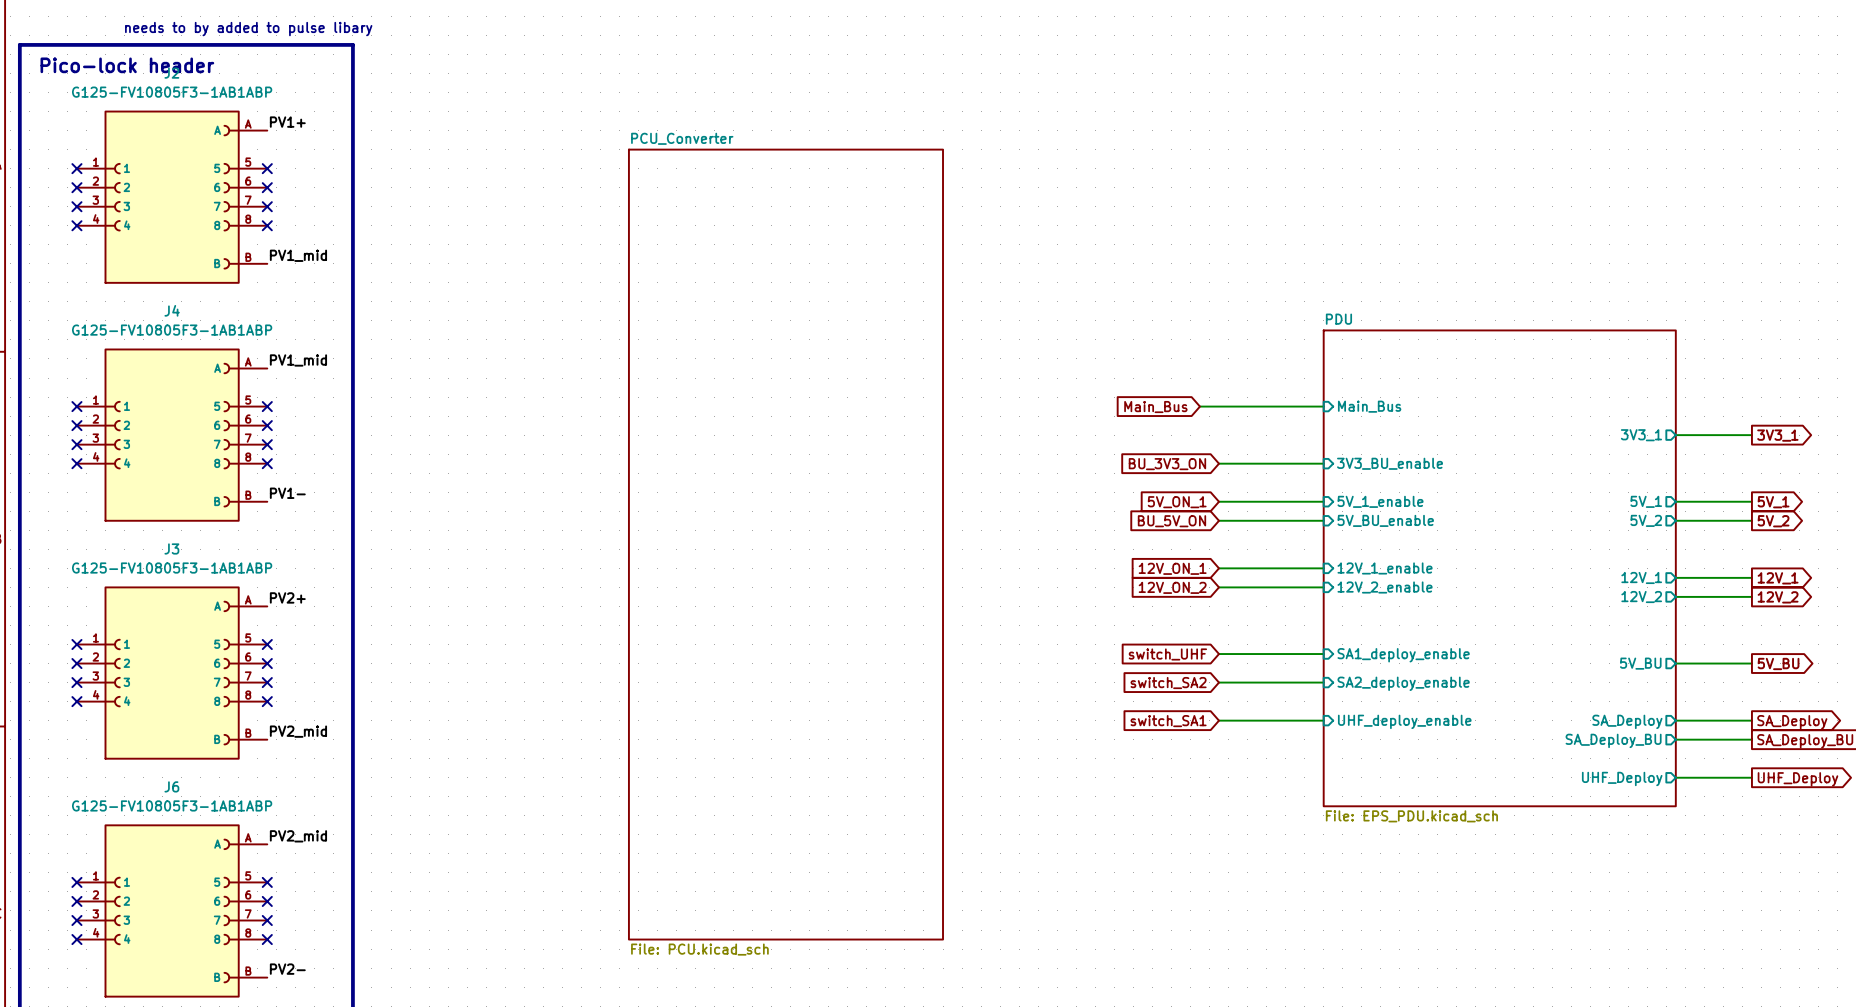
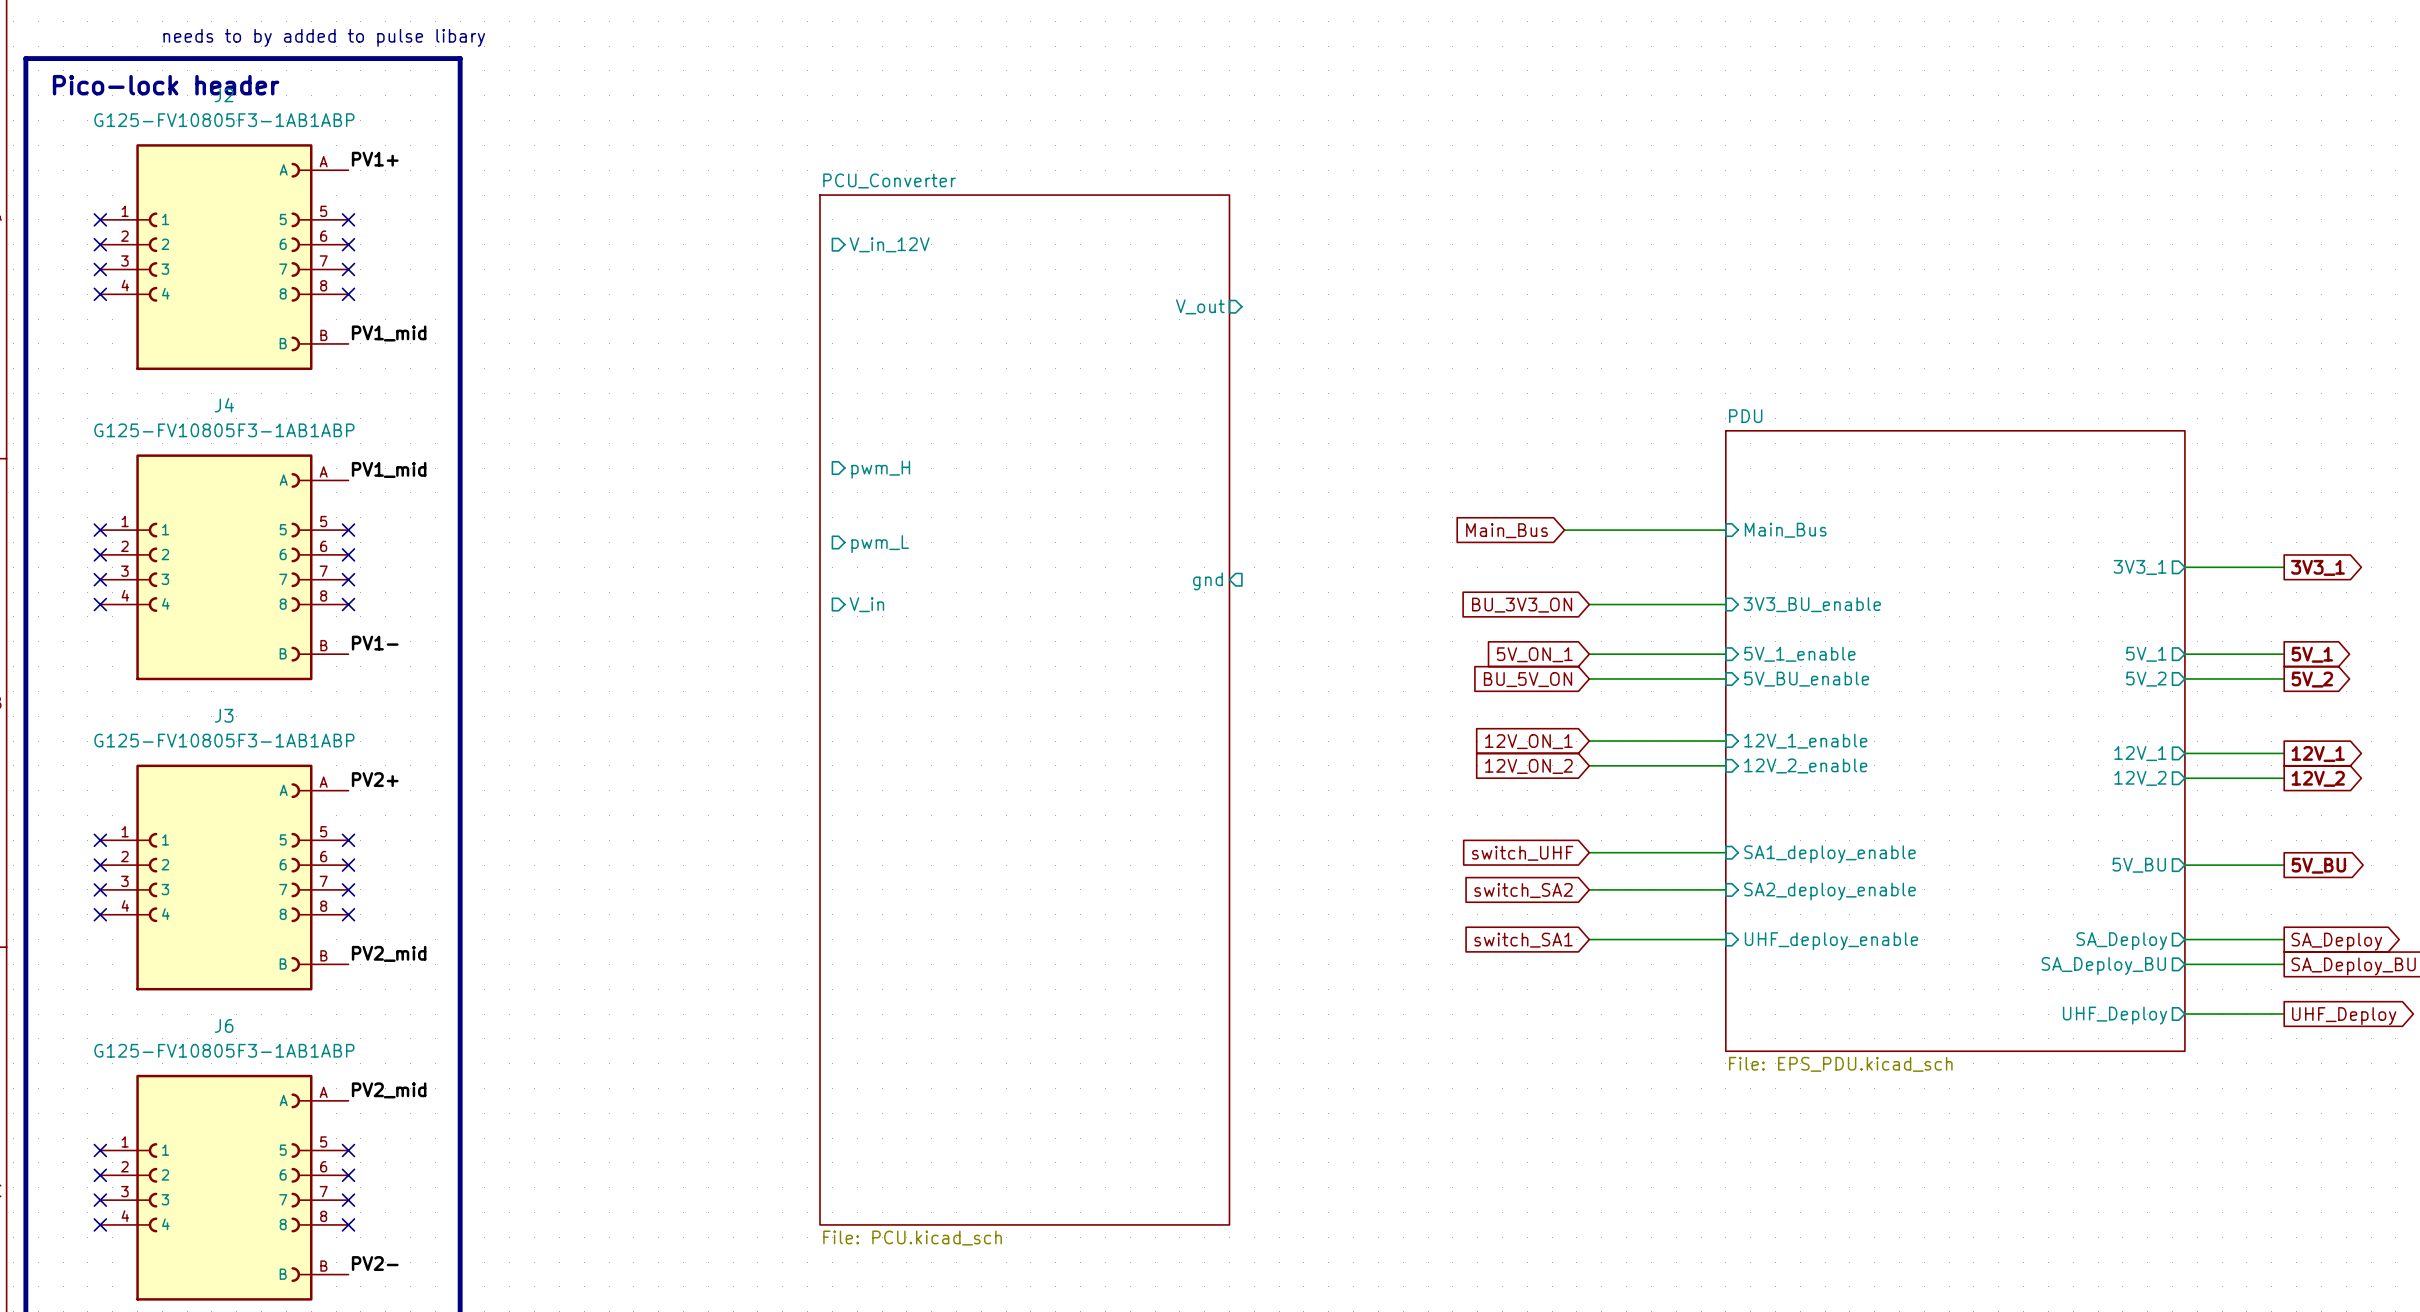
sheet pin: none -> V_in_12V (889, 244)
sheet pin: none -> V_out (1200, 306)
sheet pin: none -> pwm_H (880, 469)
sheet pin: none -> pwm_L (880, 544)
sheet pin: none -> gnd (1208, 581)
sheet pin: none -> V_in (866, 604)

